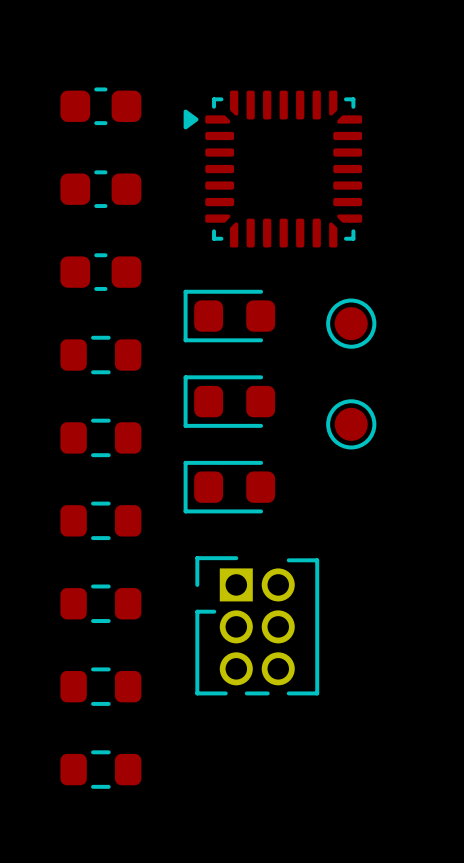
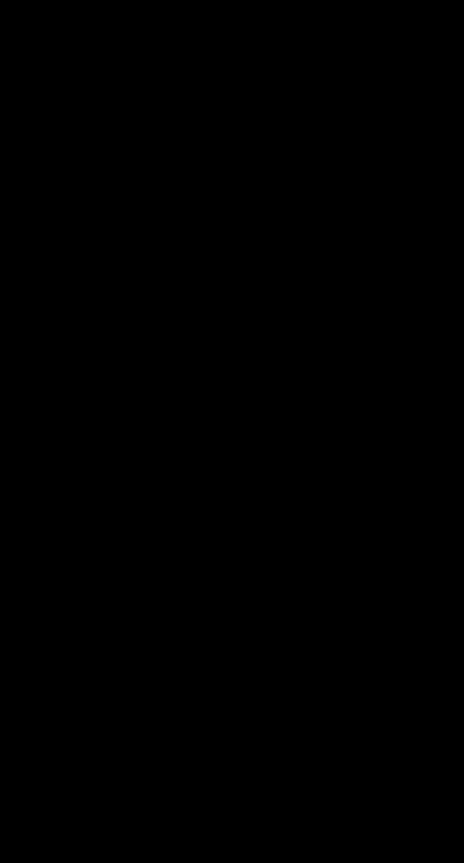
part: (100, 106) -> none
part: (272, 169) -> none
part: (100, 189) -> none
part: (100, 272) -> none
part: (229, 316) -> none
part: (351, 323) -> none
part: (100, 355) -> none
part: (229, 401) -> none
part: (351, 424) -> none
part: (100, 437) -> none
part: (229, 487) -> none
part: (100, 520) -> none
part: (100, 603) -> none
part: (257, 625) -> none
part: (100, 686) -> none
part: (100, 769) -> none

